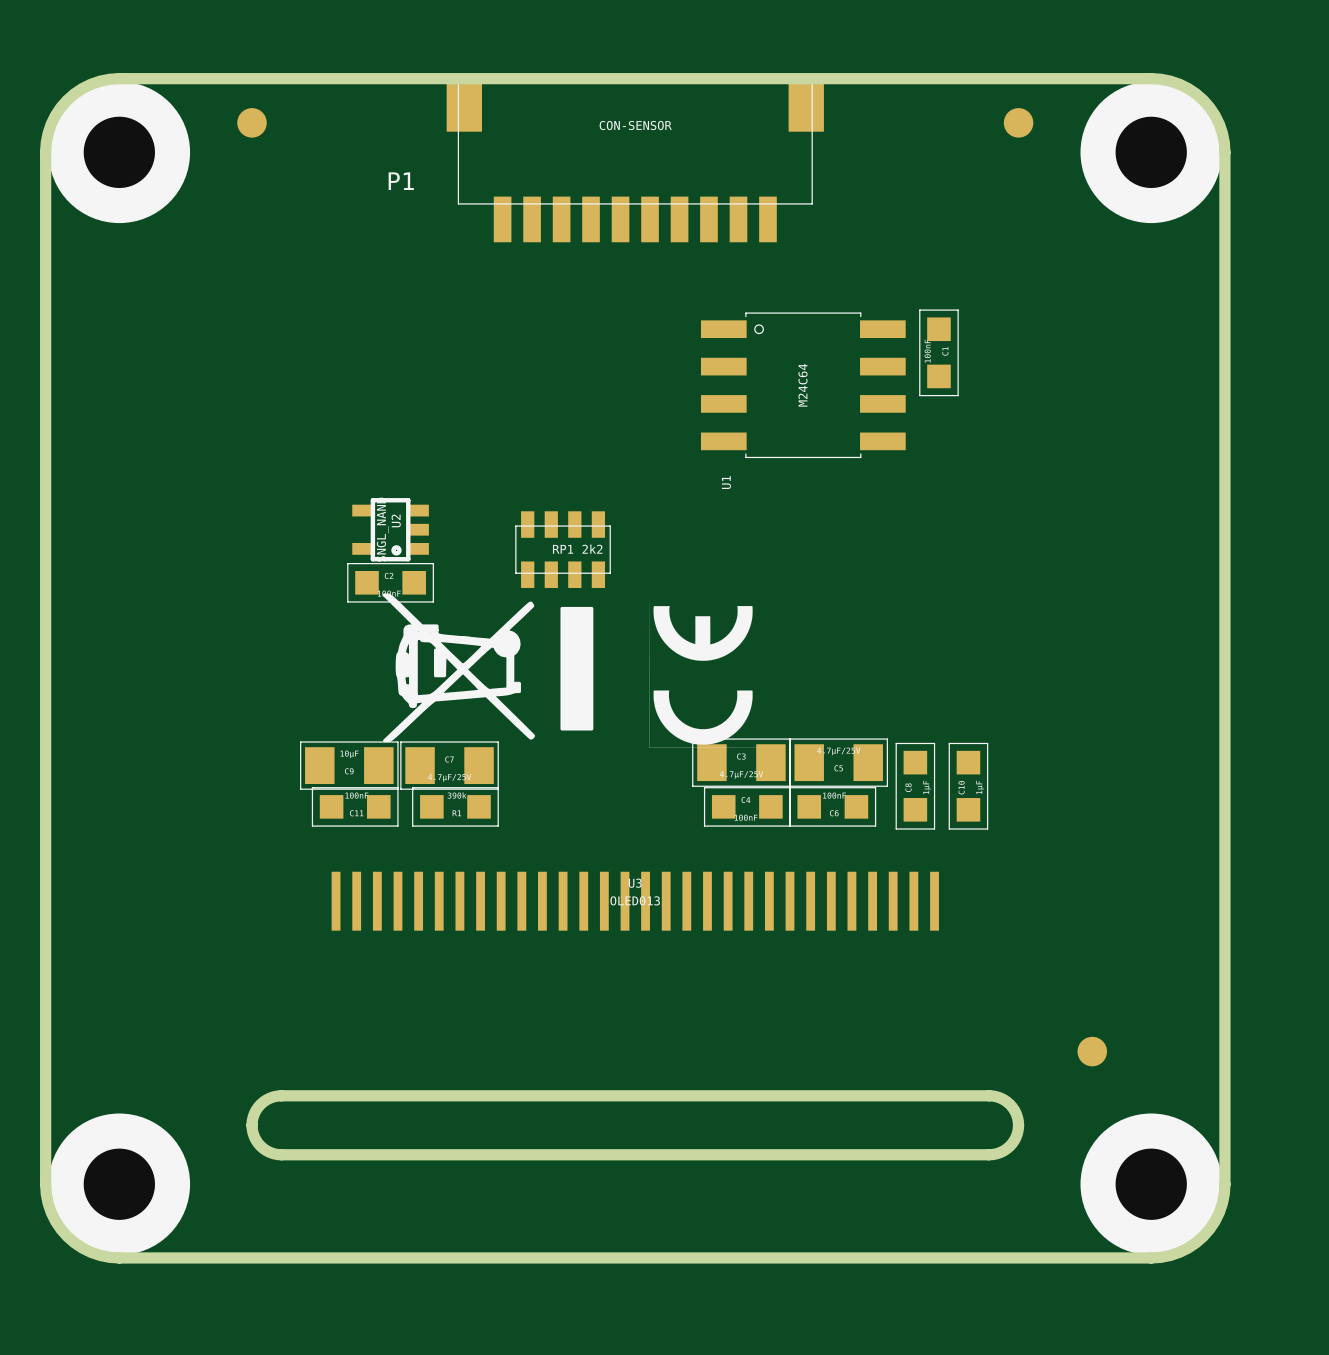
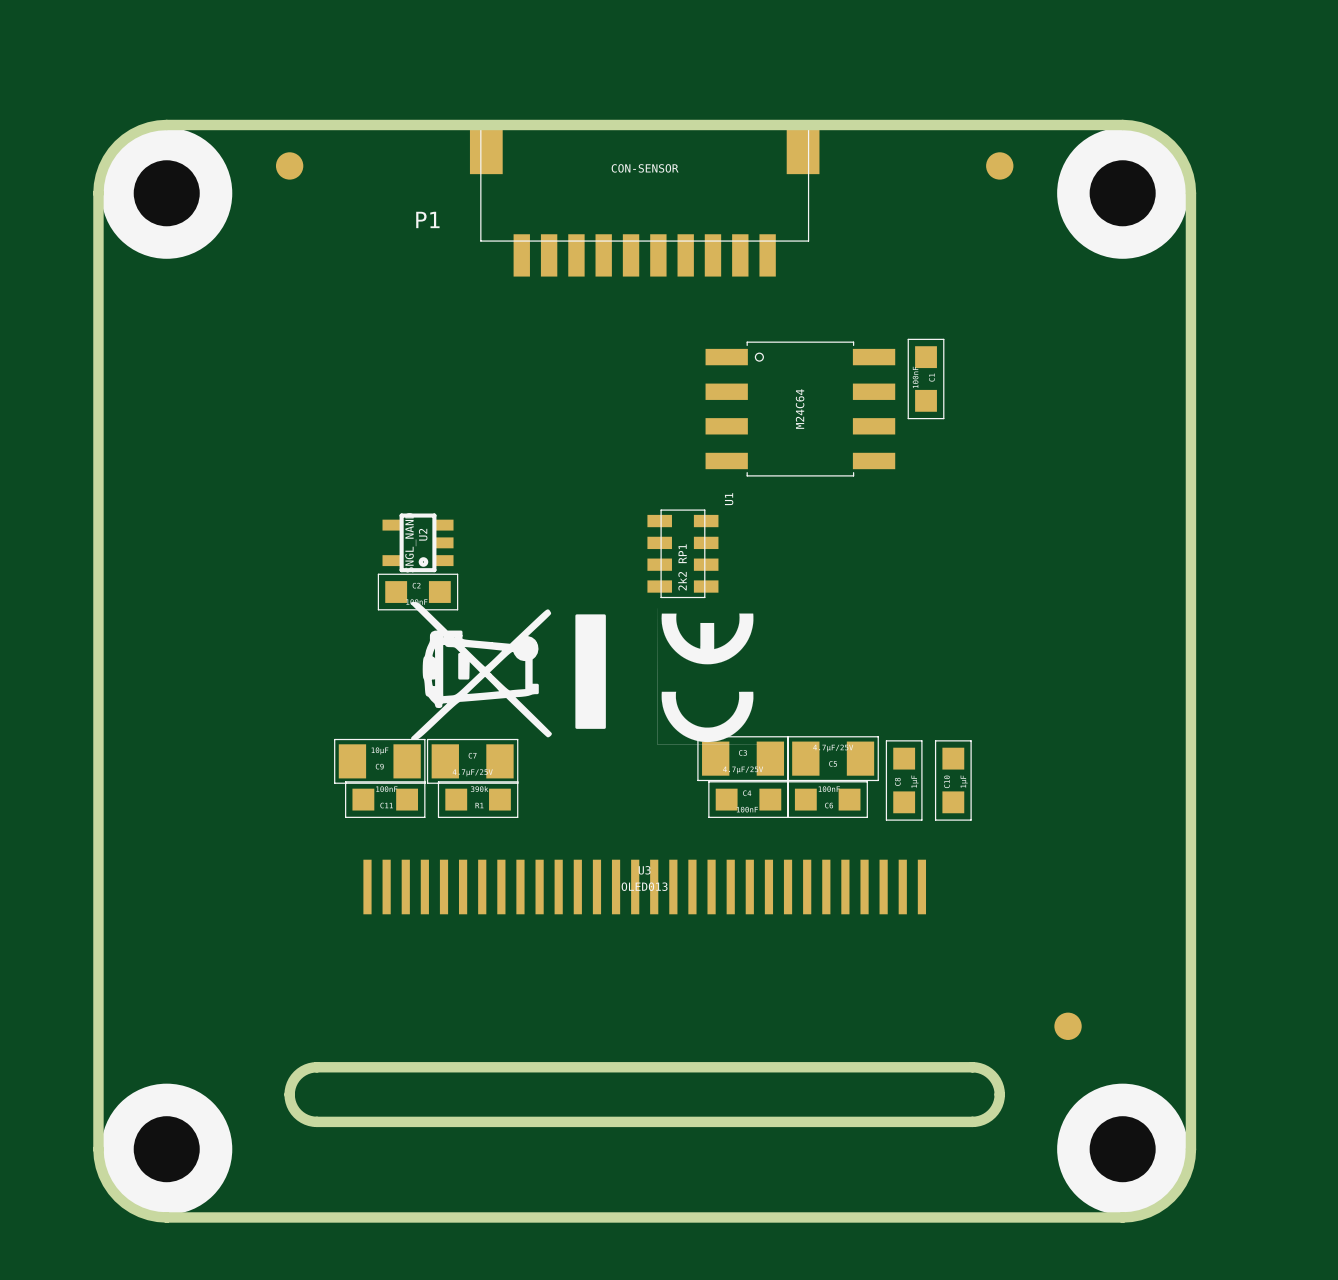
RP1 rotation: 0° (563, 549) -> 90° clockwise (682, 553)
RP1 position: (563, 549) -> (682, 553)

